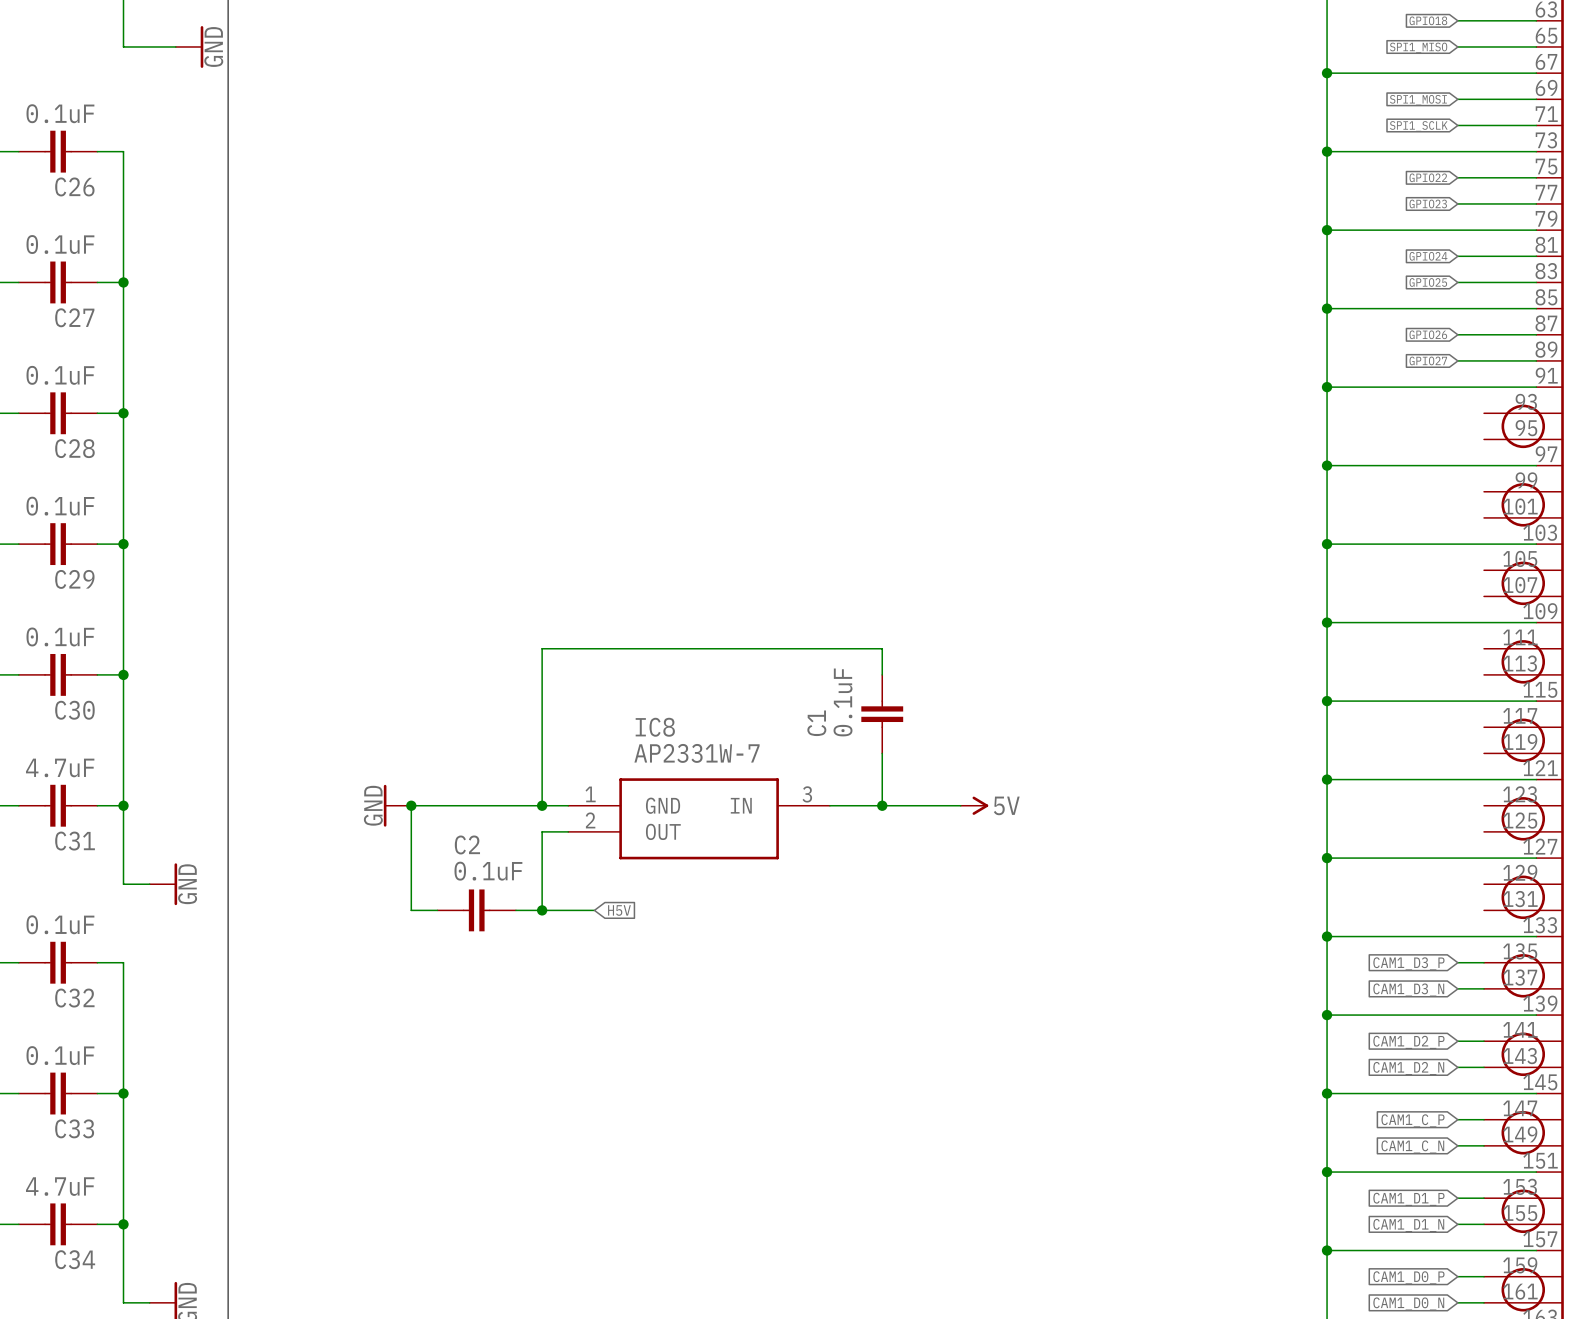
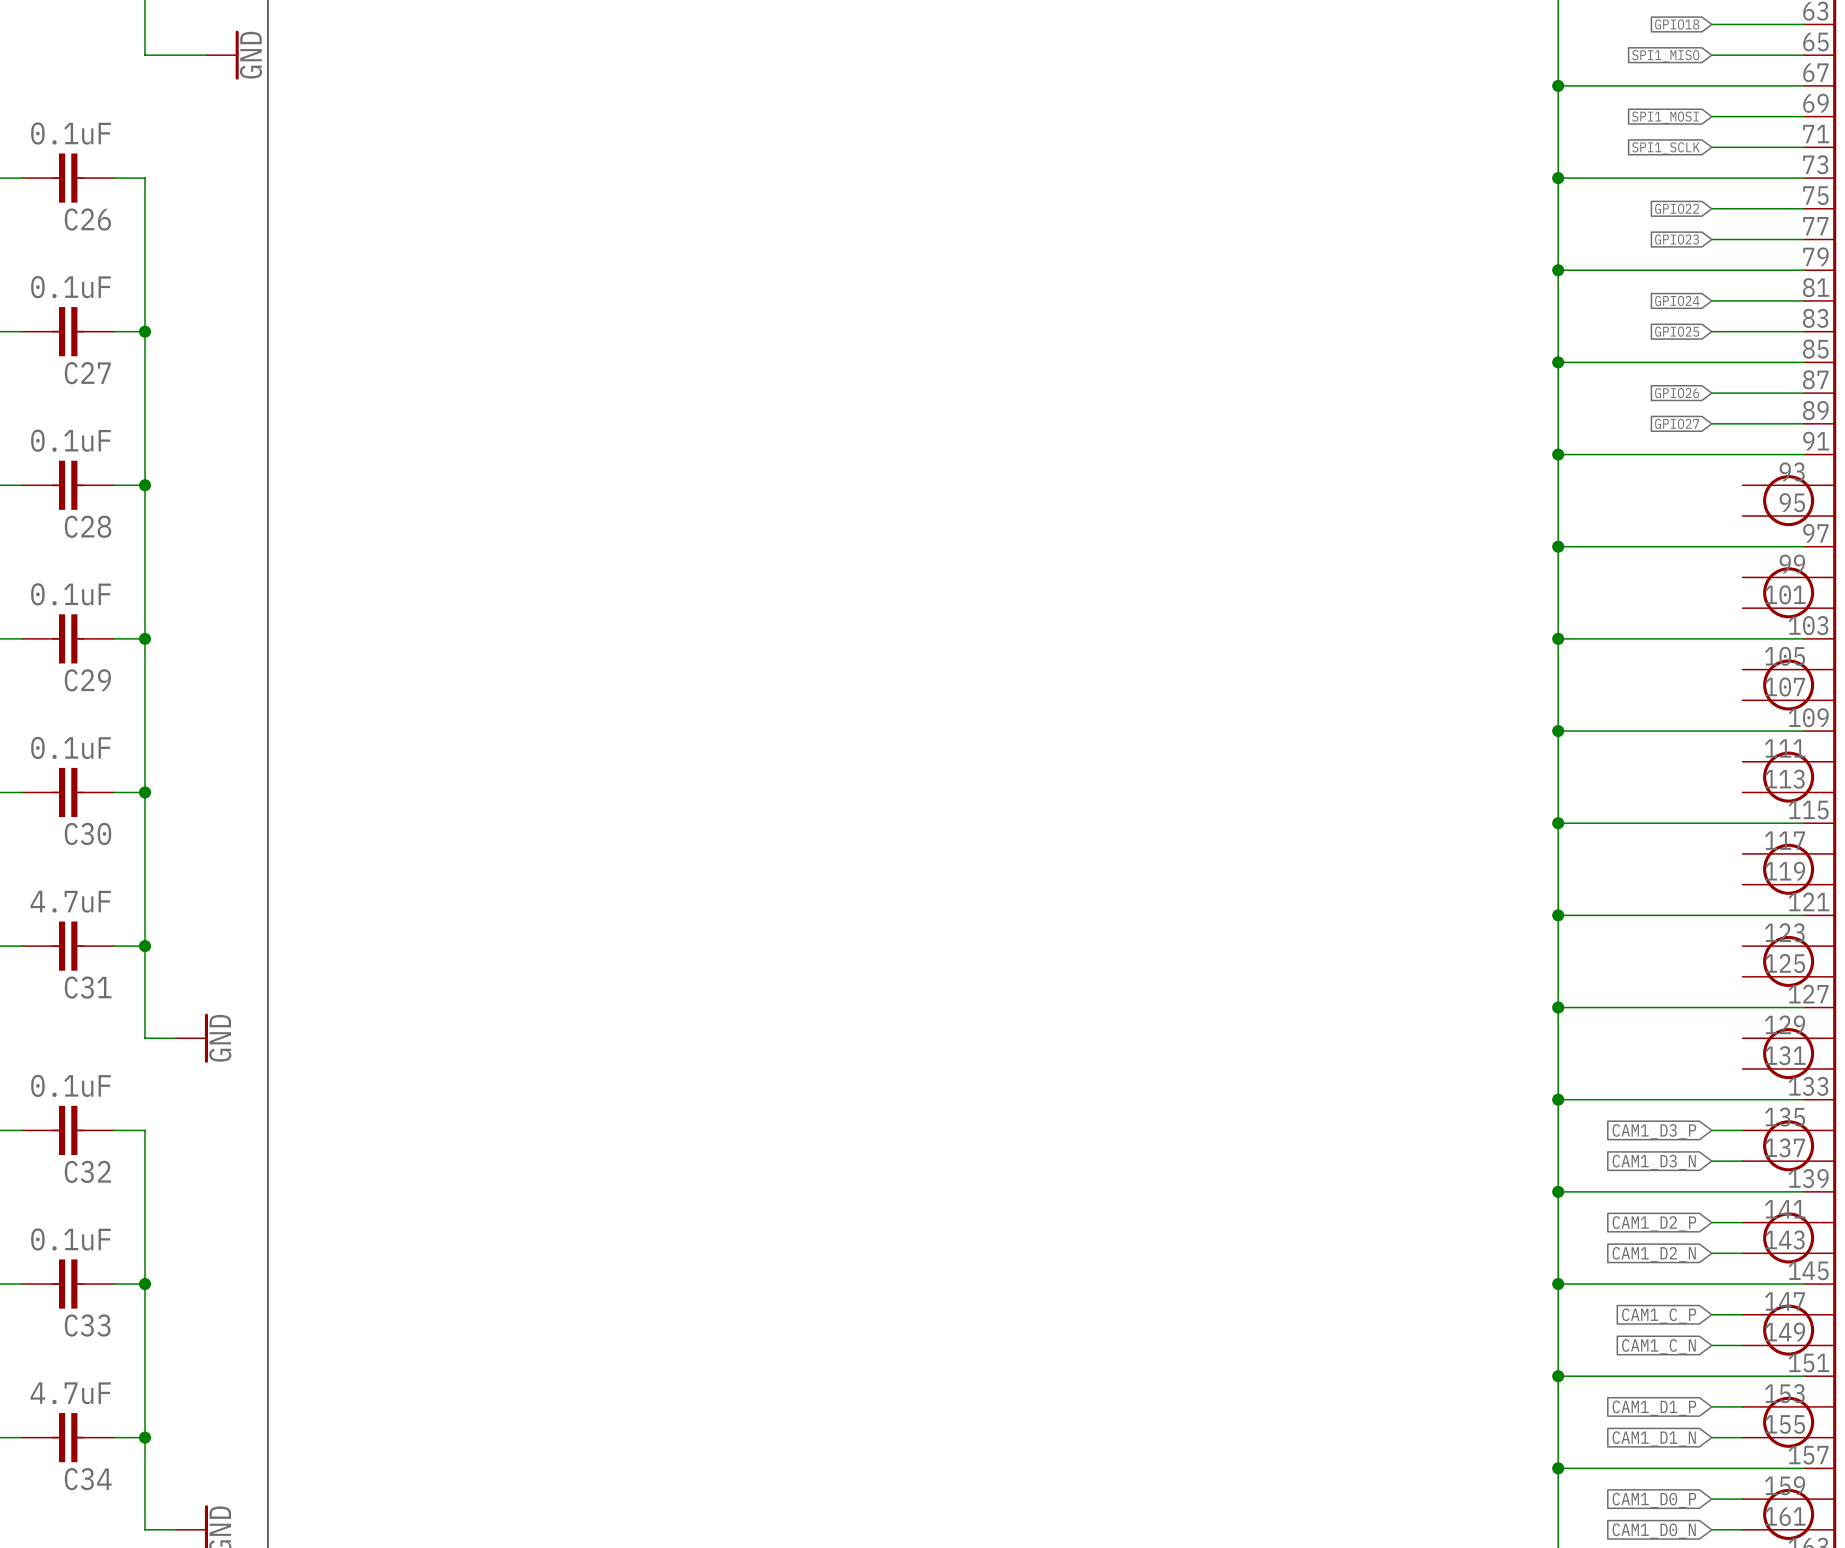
wire: (882, 674) (882, 648) (542, 648) (542, 805) -> none
C1: 0.1uF (882, 714) -> none
wire: (882, 753) (882, 805) -> none
power symbol: GND (397, 805) -> none
junction: (411, 805) -> none
junction: (542, 805) -> none
wire: (568, 805) (411, 805) (411, 910) (437, 910) -> none
wire: (829, 805) (960, 805) -> none
junction: (882, 805) -> none
power symbol: 5V (974, 805) -> none
IC8: AP2331W-7 (699, 818) -> none
wire: (568, 831) (542, 831) (542, 910) -> none
C2: 0.1uF (476, 910) -> none
wire: (515, 910) (594, 910) -> none
junction: (542, 910) -> none
global label: H5V (619, 910) -> none

